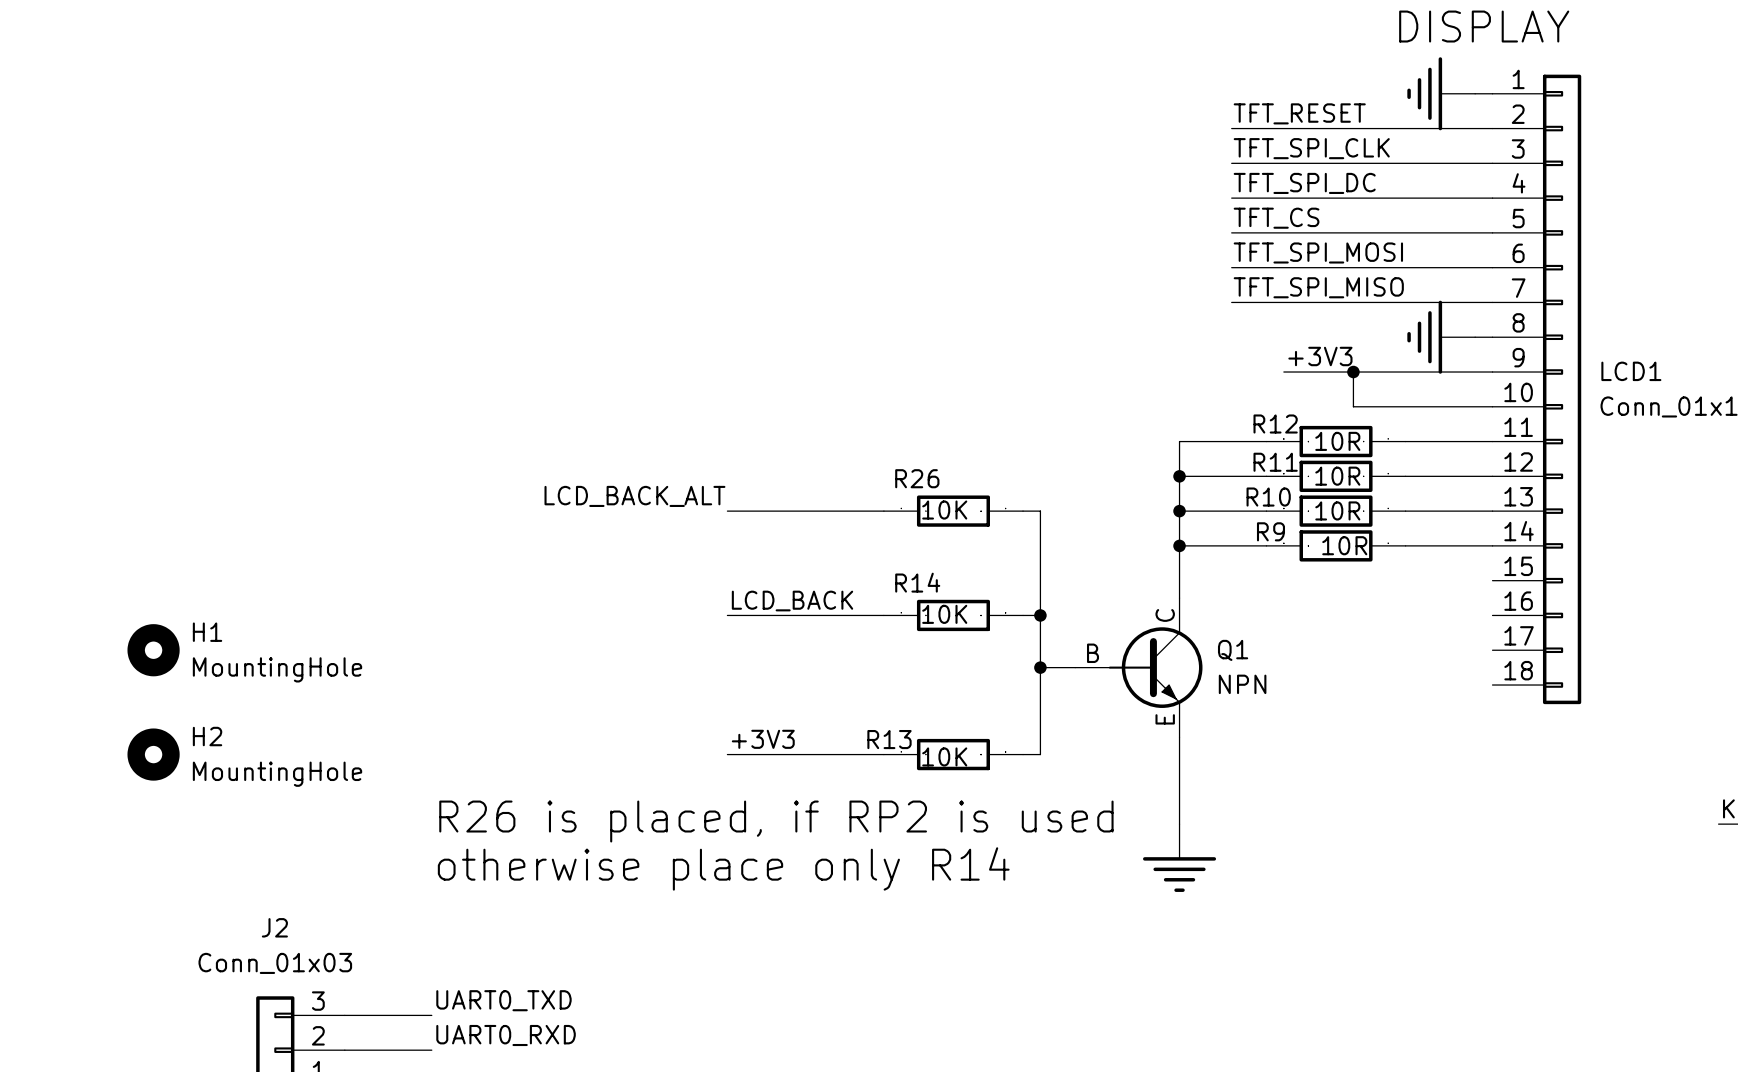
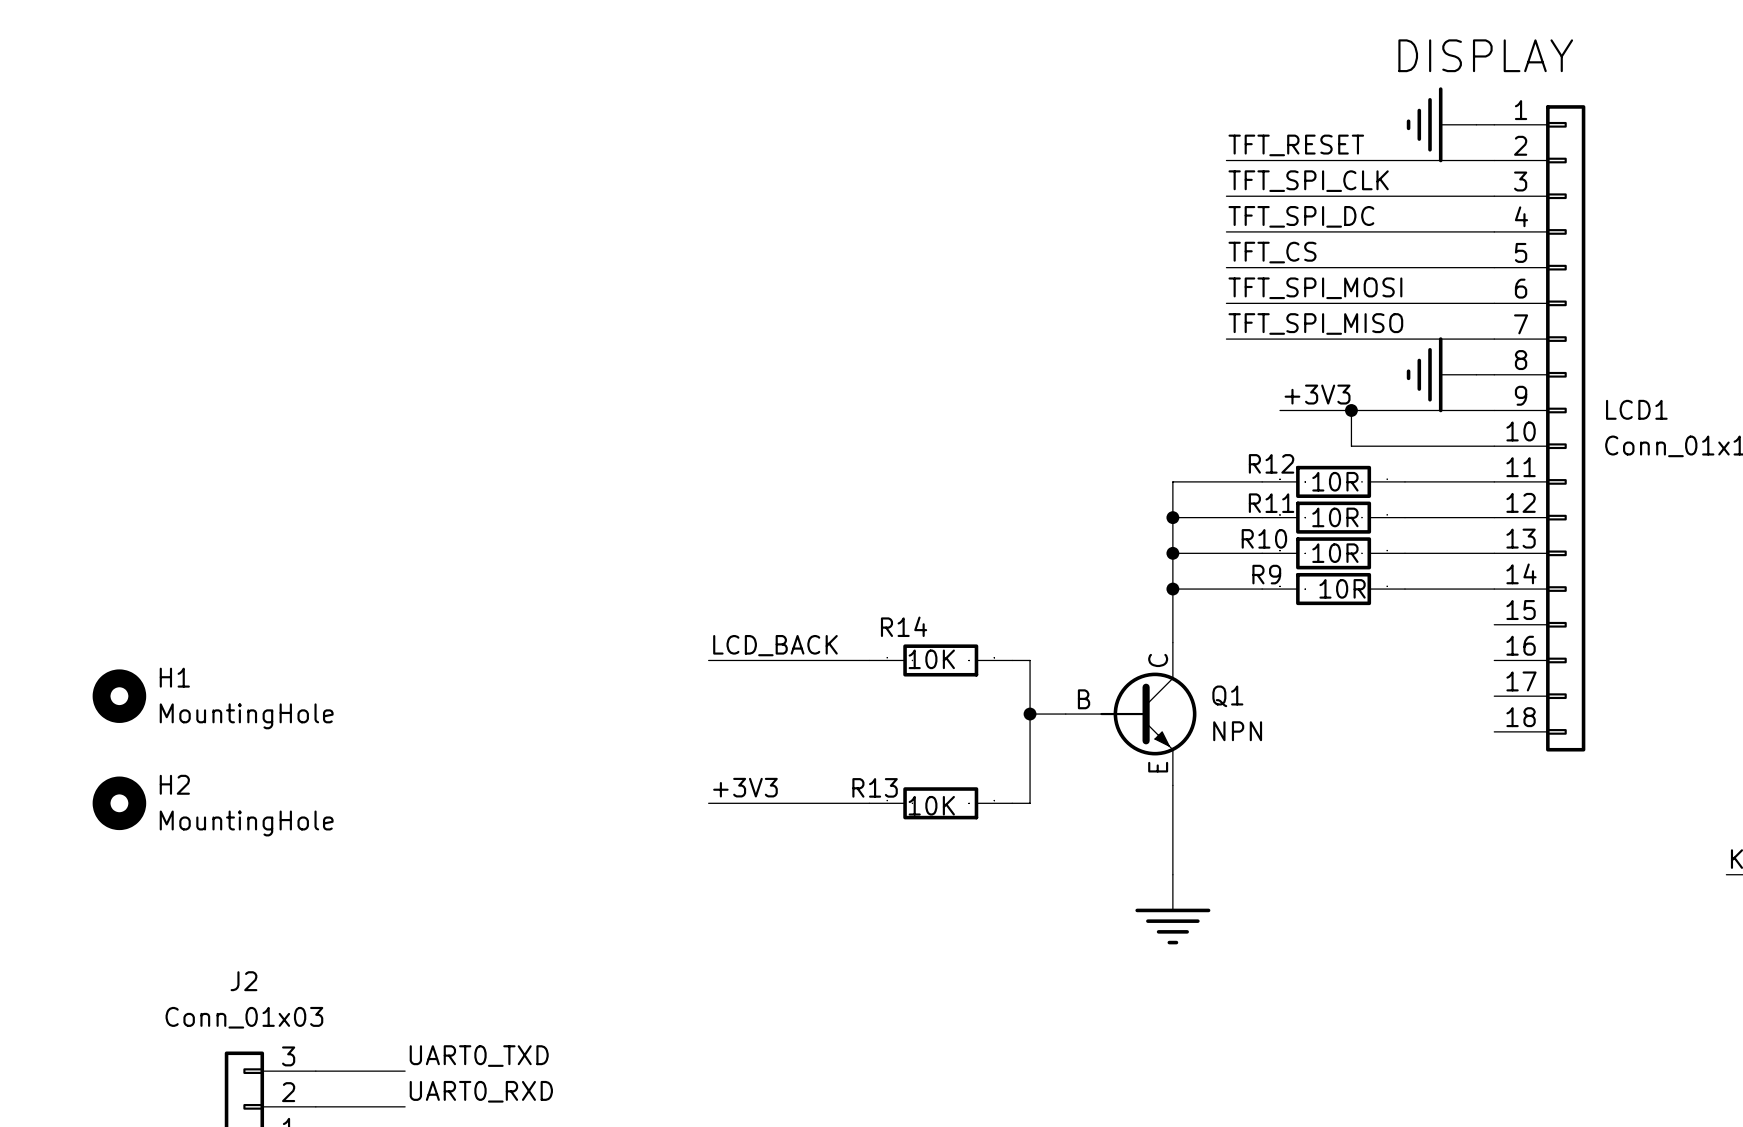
label: LCD_BACK_ALT (634, 496) -> none
wire: (727, 511) (883, 511) -> none
R26: 10K (953, 511) -> none
wire: (1023, 511) (1040, 511) (1040, 615) -> none
junction: (1040, 615) -> none
text: R26 is placed, if RP2 is used (776, 821) -> none
text: otherwise place only R14 (723, 868) -> none

